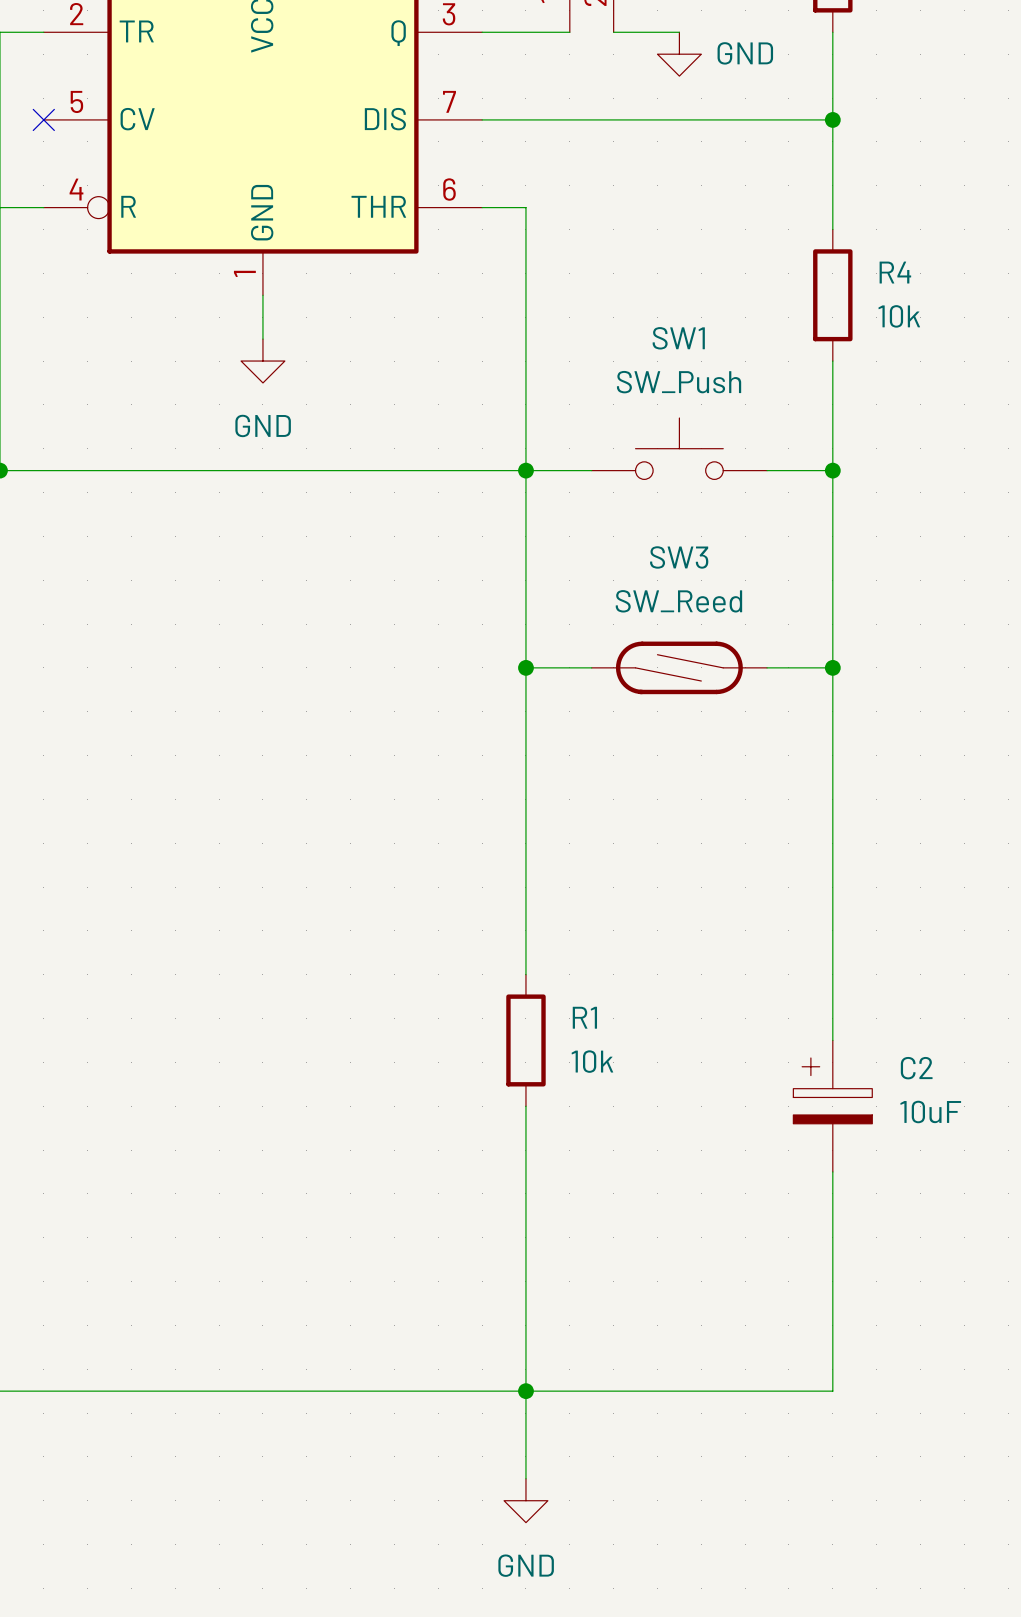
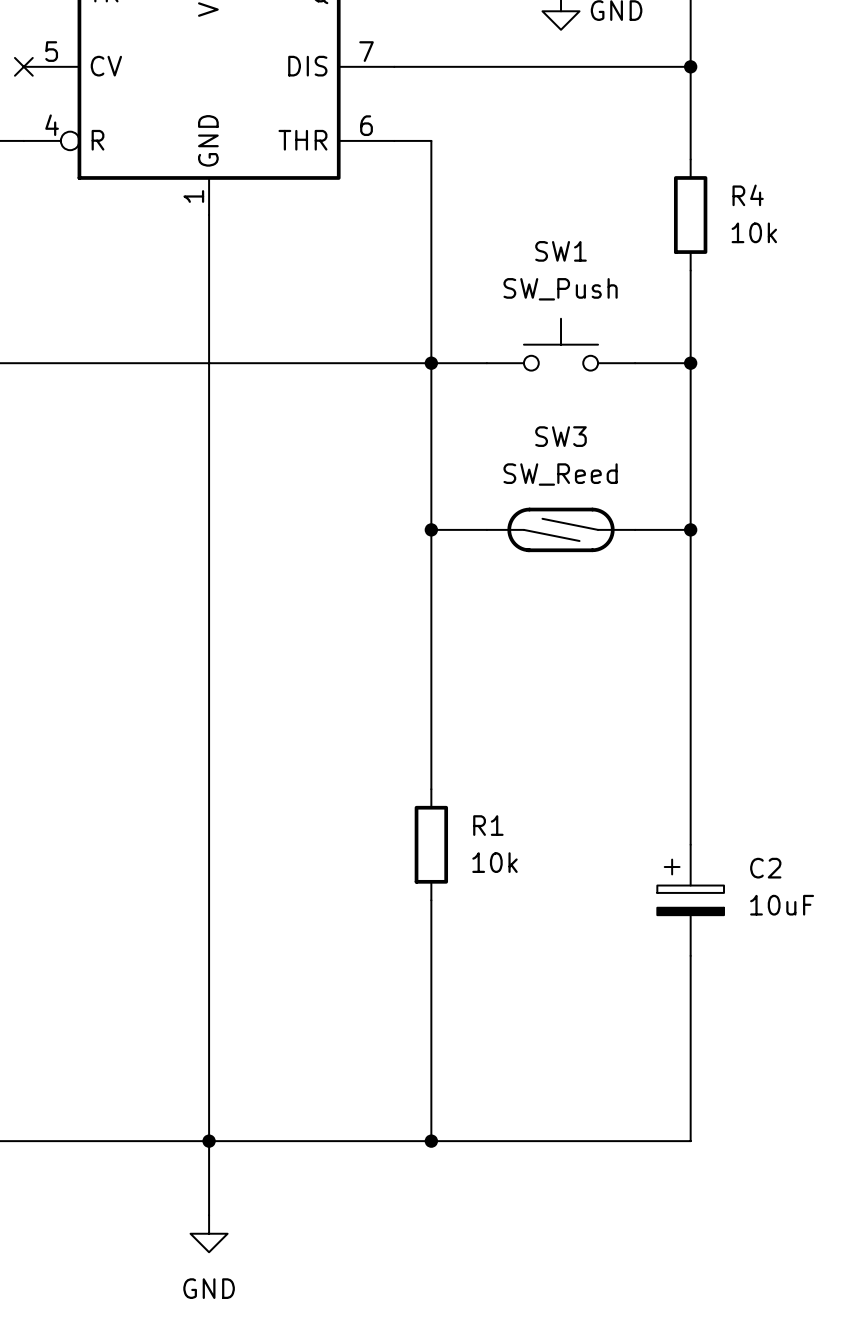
wire: none -> (209, 252) (209, 1215)
power symbol: GND (262, 361) -> none
junction: none -> (209, 1141)
wire: (525, 1391) (525, 1478) -> none
power symbol position: GND (525, 1500) -> GND (209, 1233)

